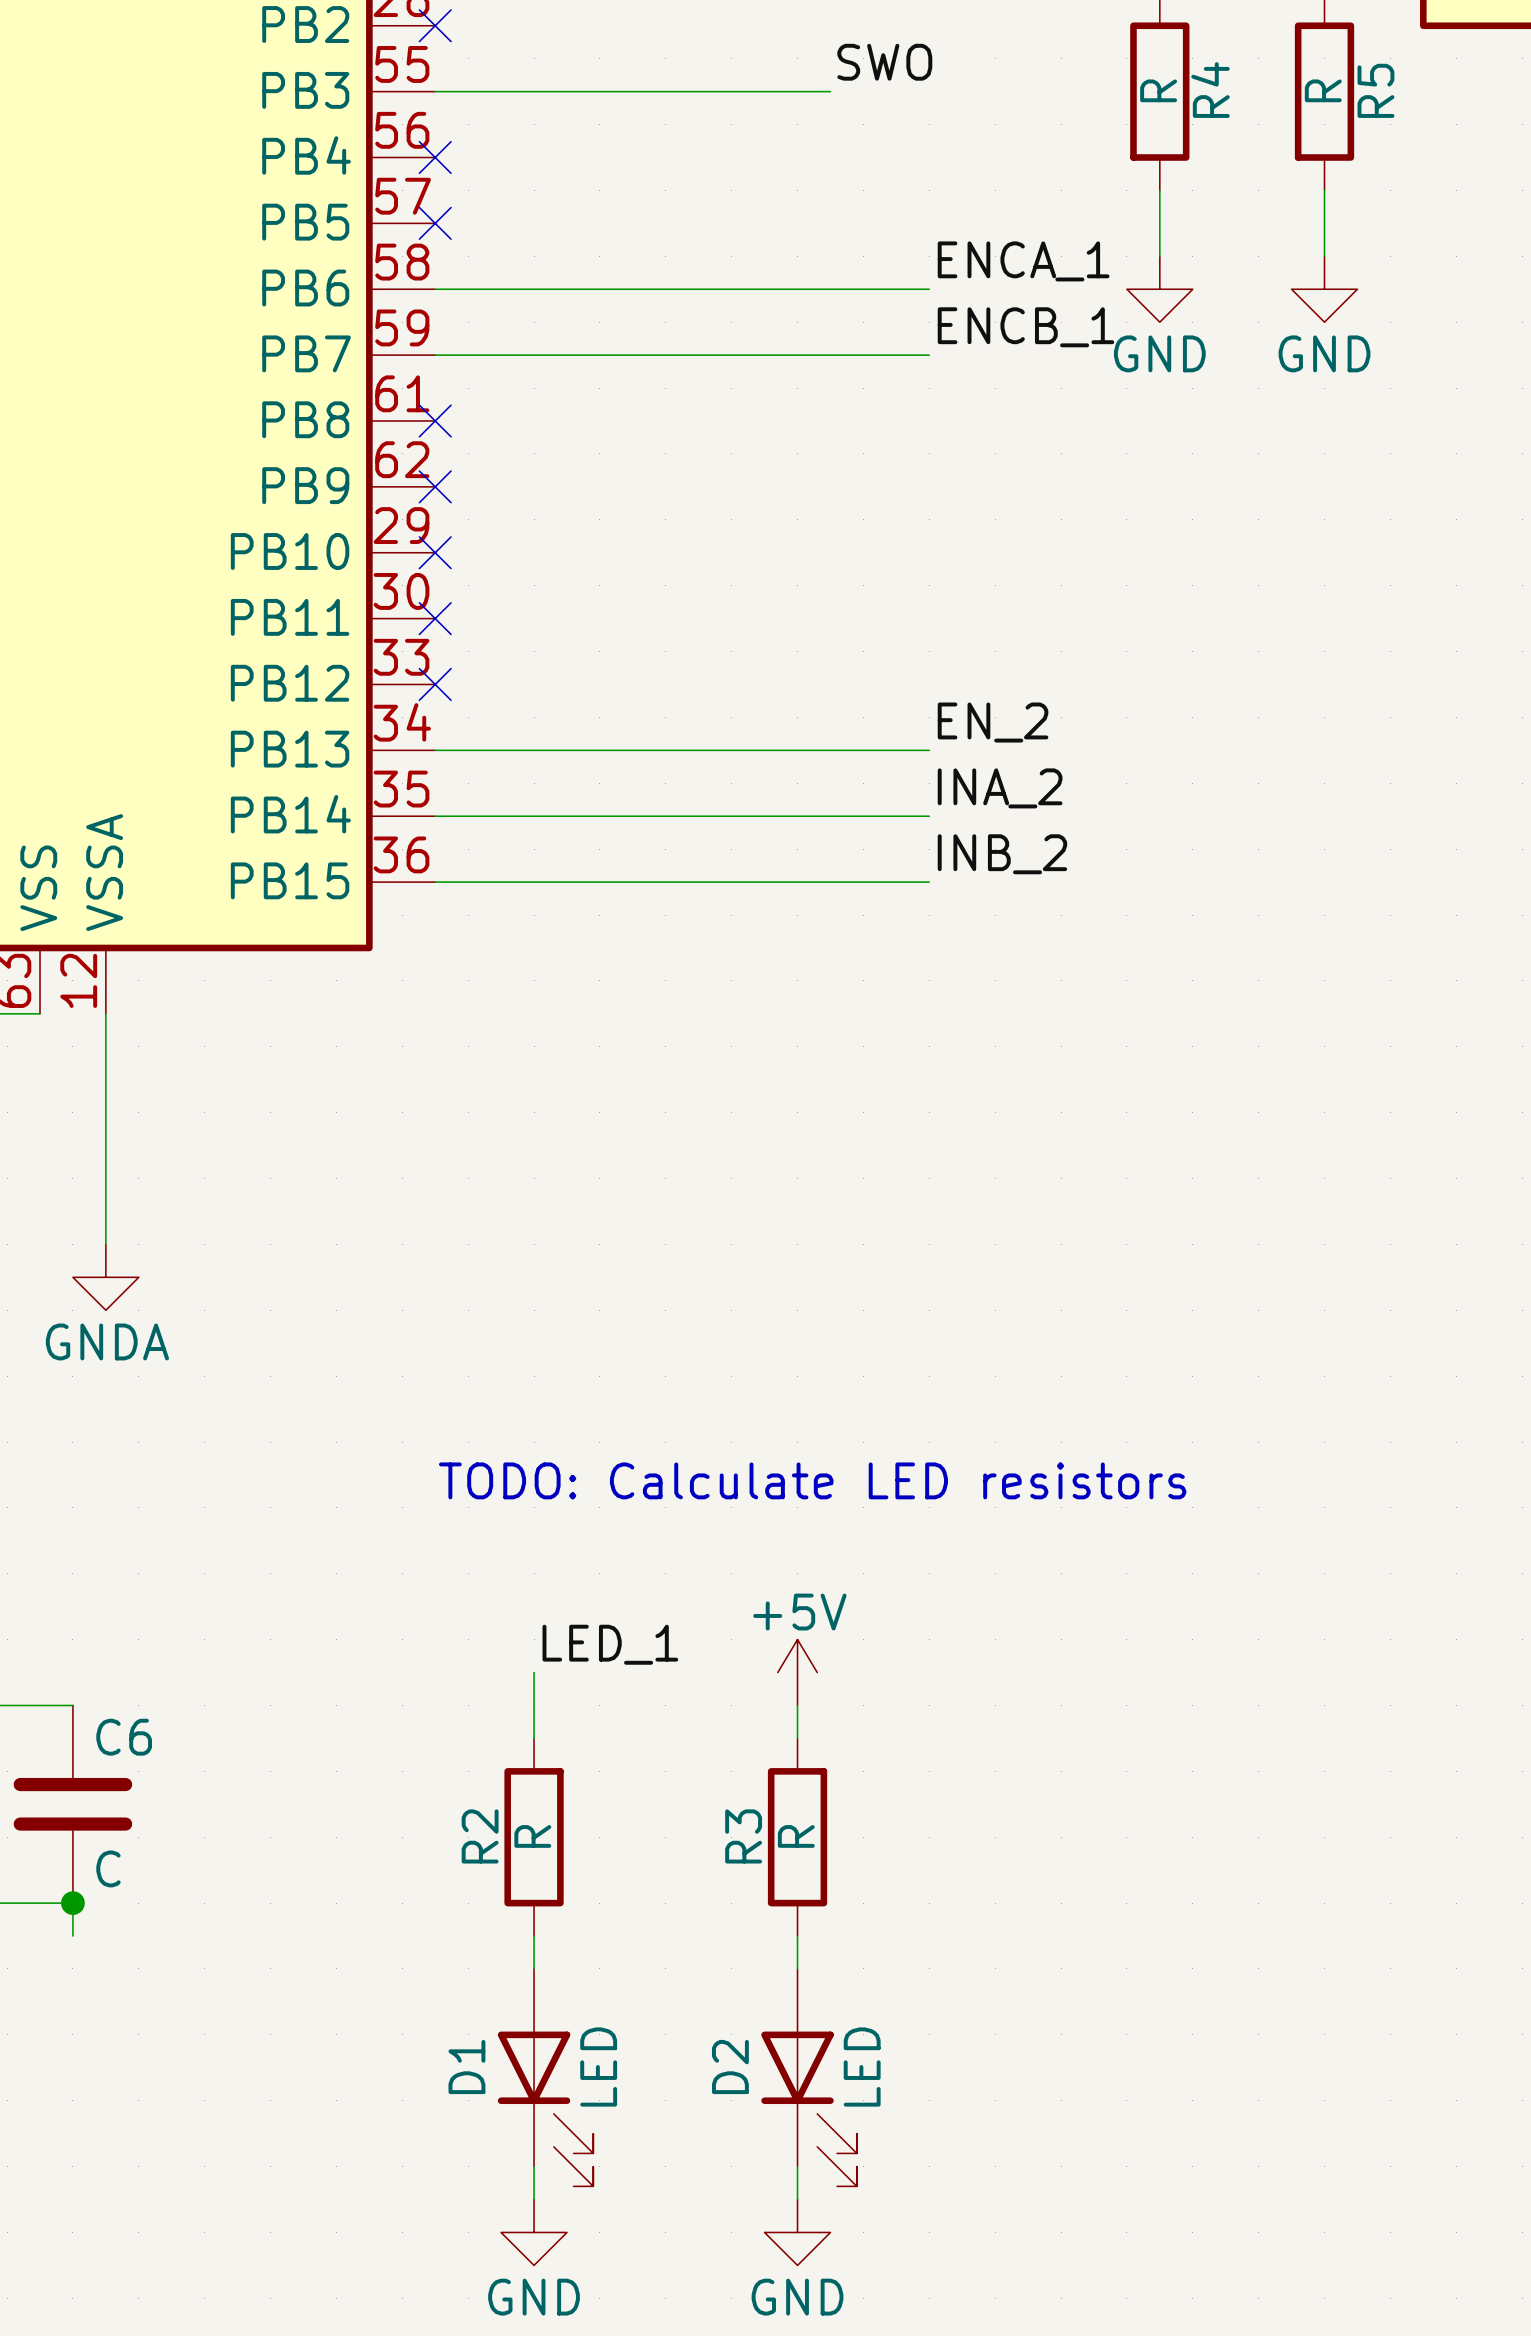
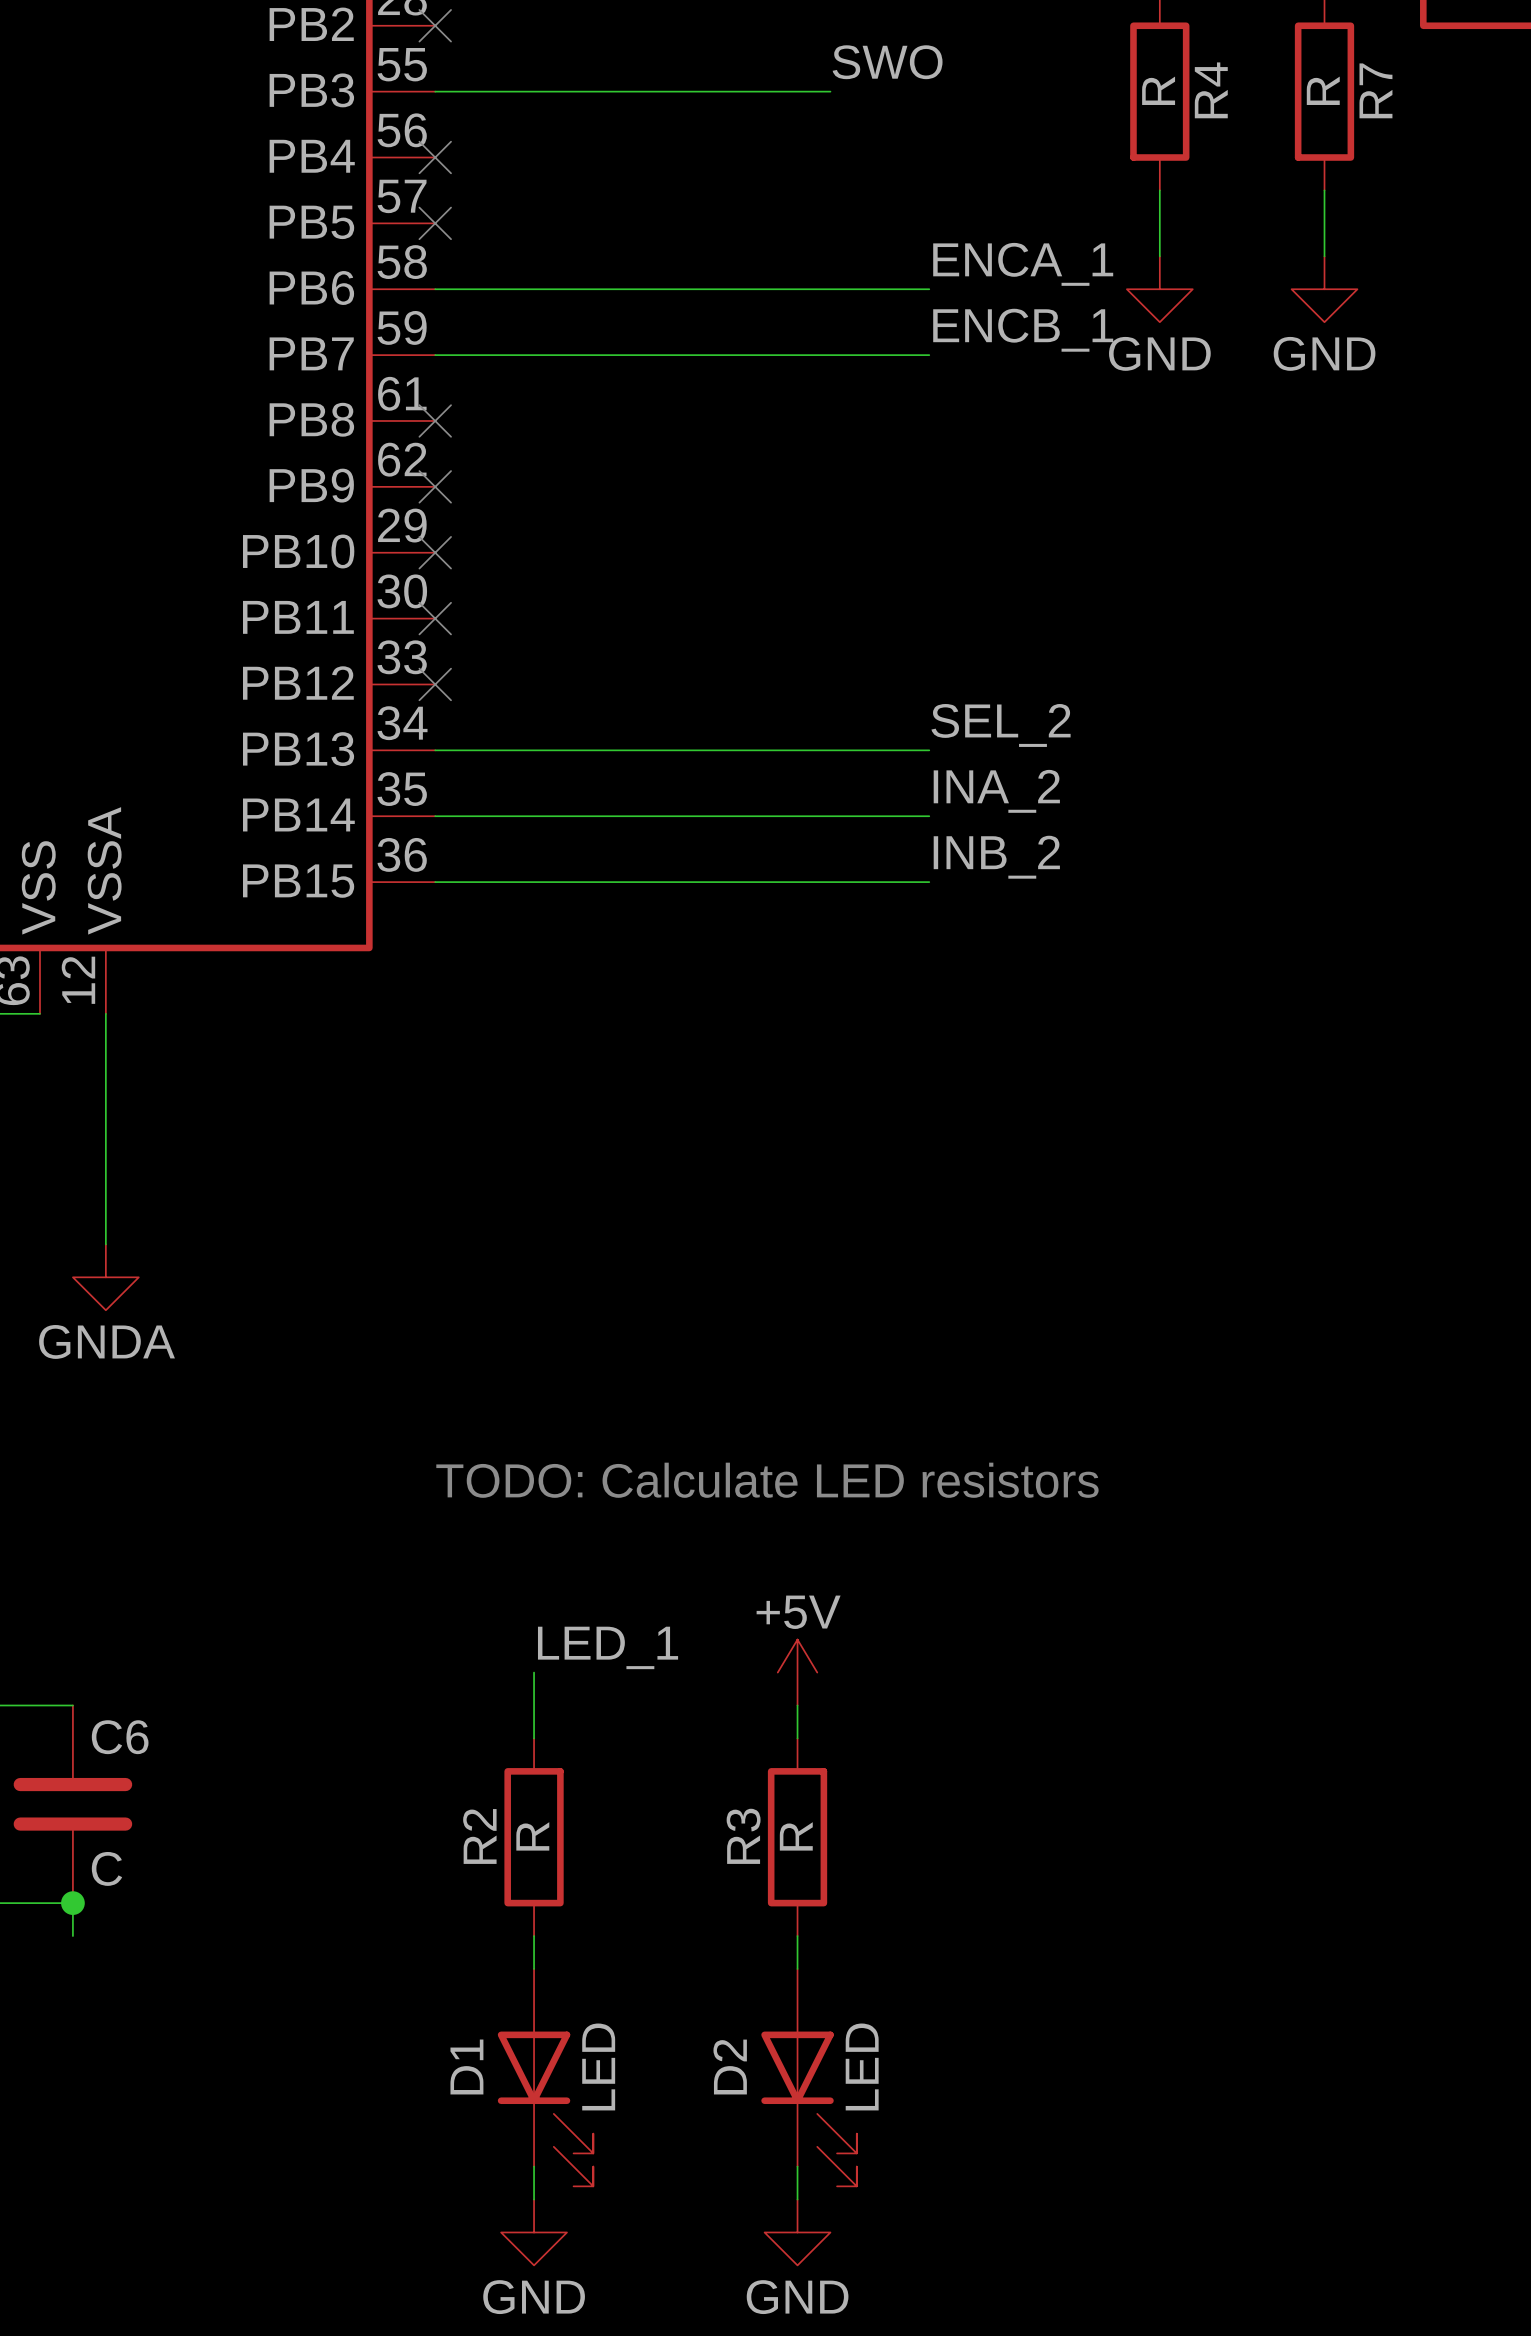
R5 name: R5 (1375, 90) -> R7 (1375, 90)
label: EN_2 (993, 722) -> SEL_2 (1001, 725)

